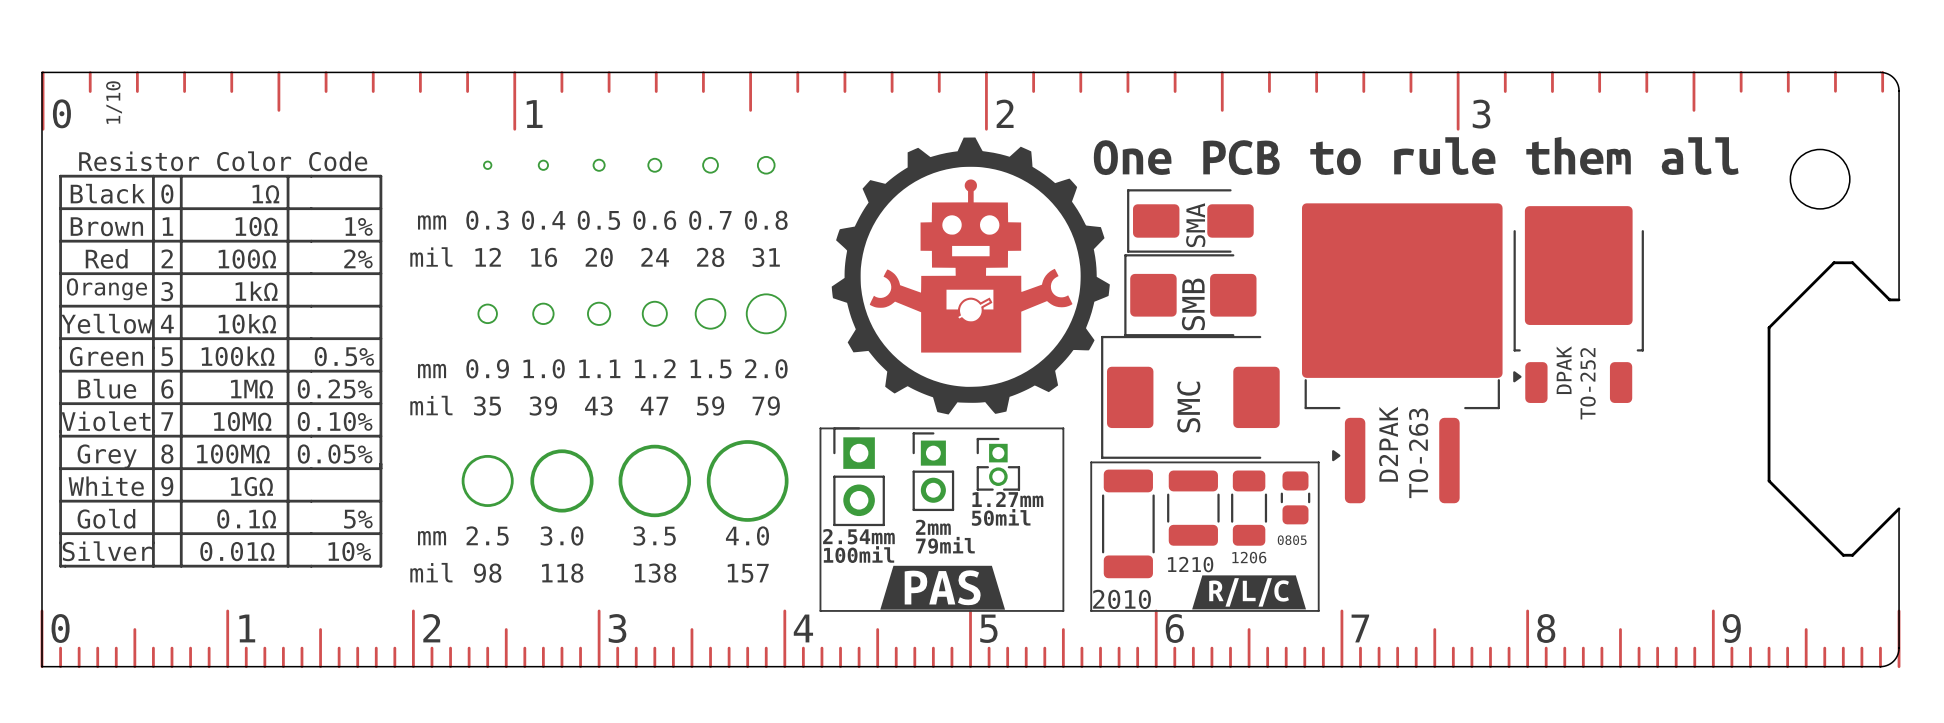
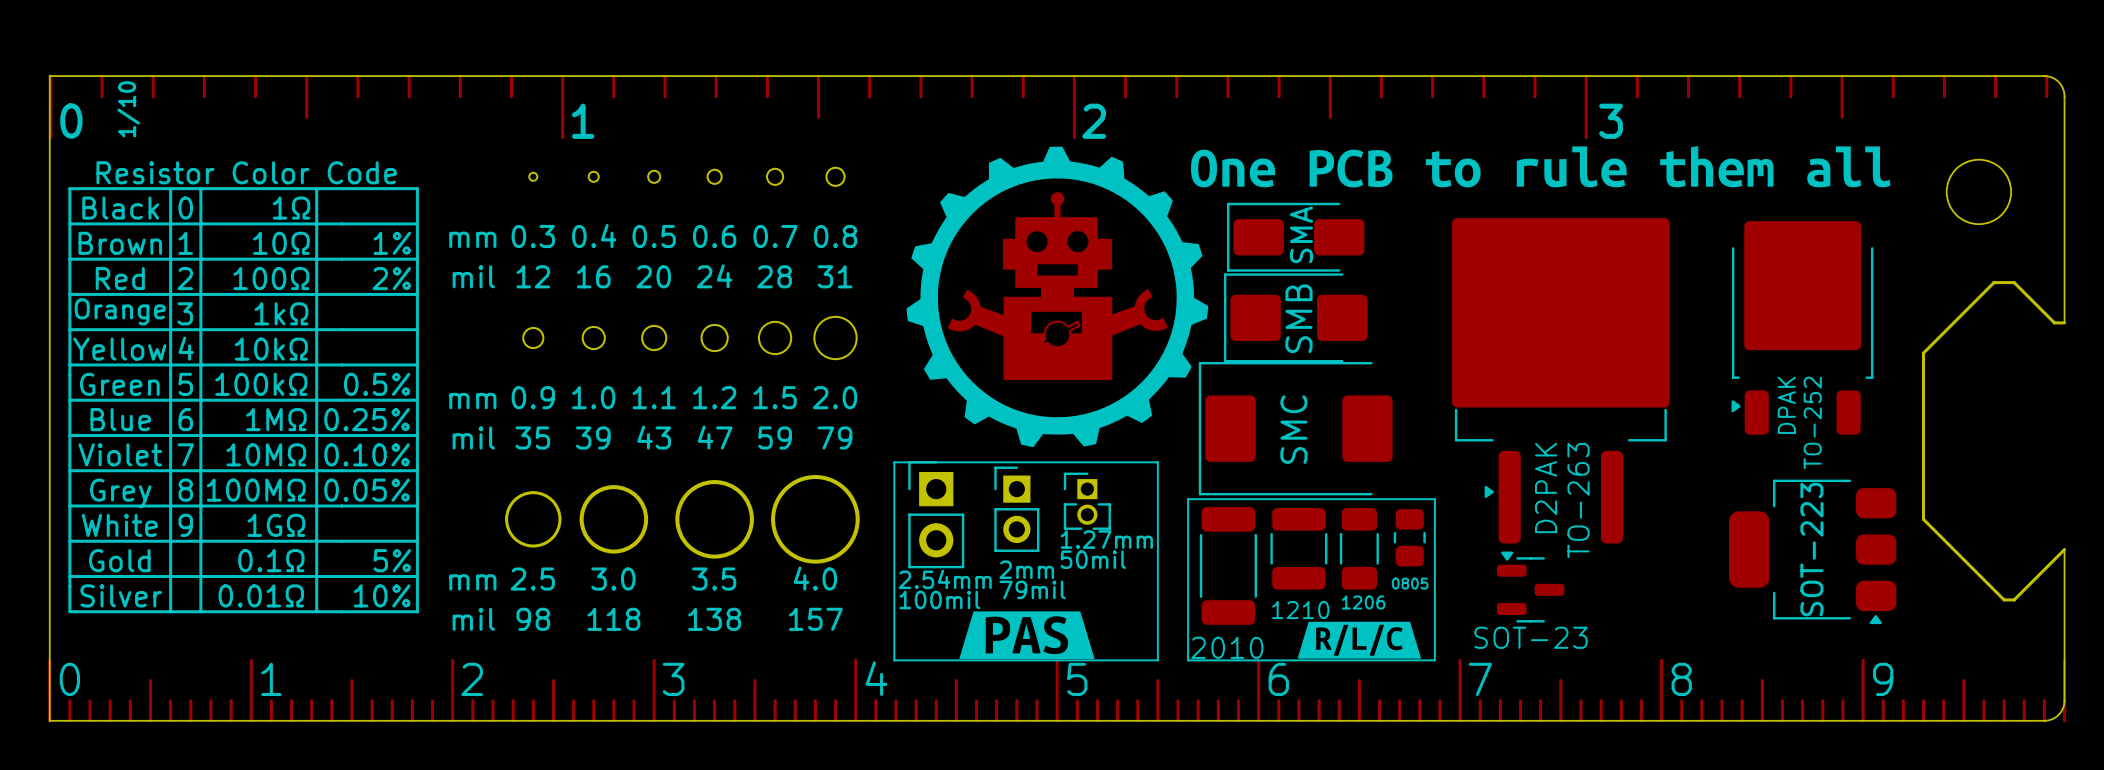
part position: (1578, 304) -> (1802, 327)
part position: (1402, 353) -> (1560, 380)
text position: DPAK (1564, 370) -> DPAK (1786, 405)
text position: TO-252 (1588, 383) -> TO-252 (1812, 422)
text: D2PAK (1388, 444) -> none
text: TO-263 (1418, 453) -> D2PAK (1546, 488)
text: none -> TO-263 (1578, 500)
part: none -> SOT-223 (1812, 551)
part: none -> (1530, 587)
text: none -> SOT-23 (1530, 637)

